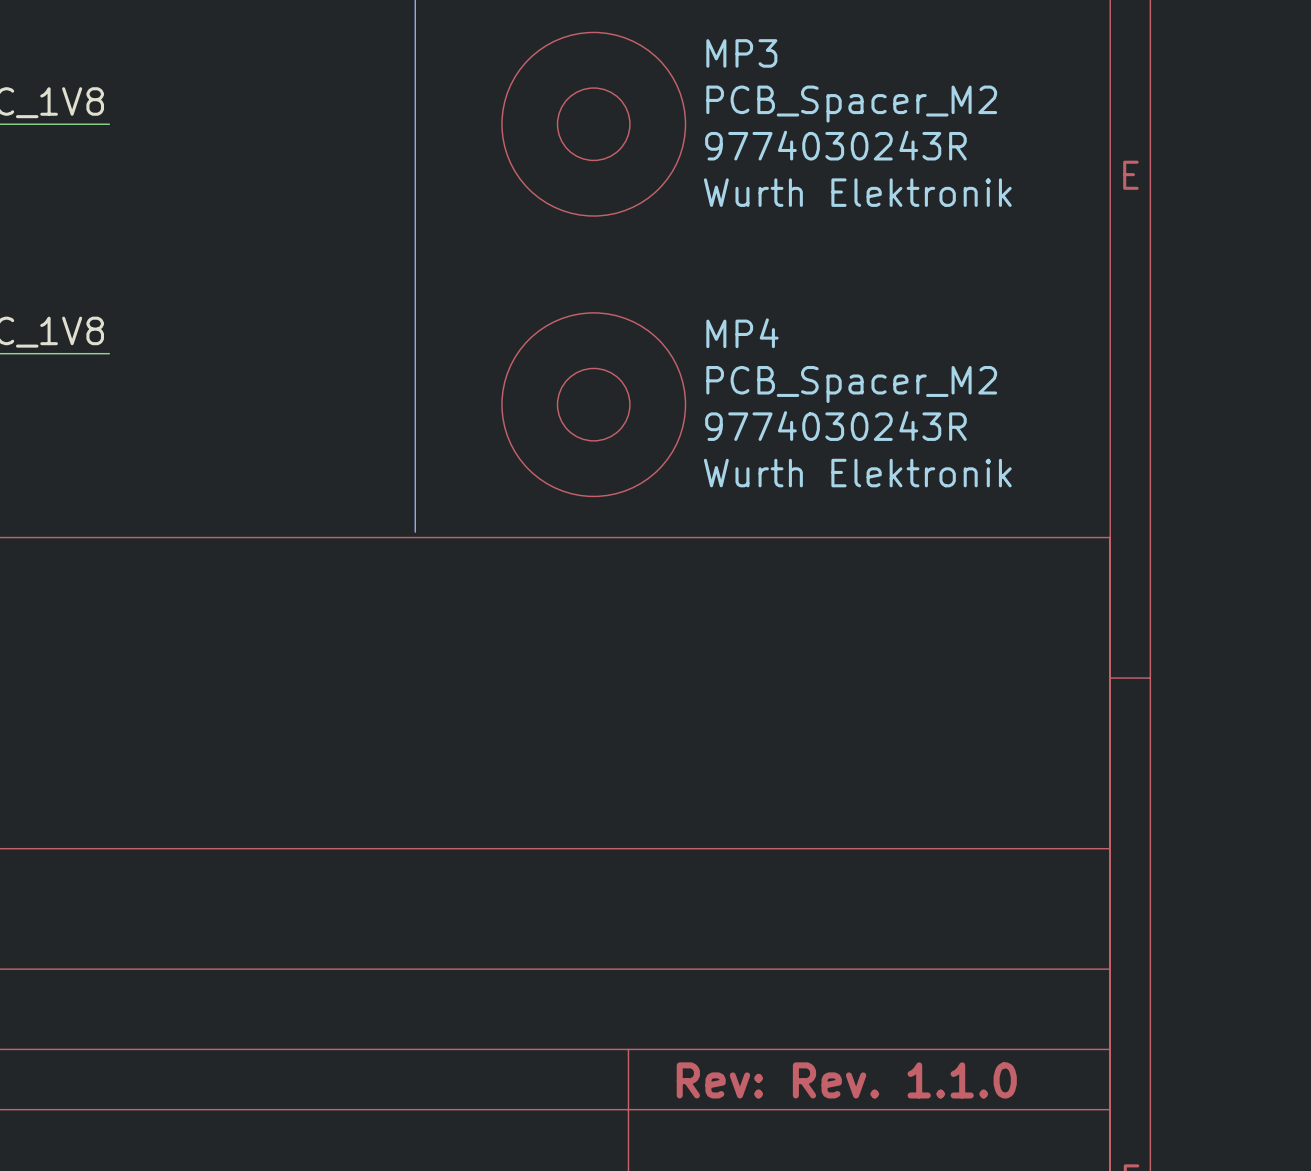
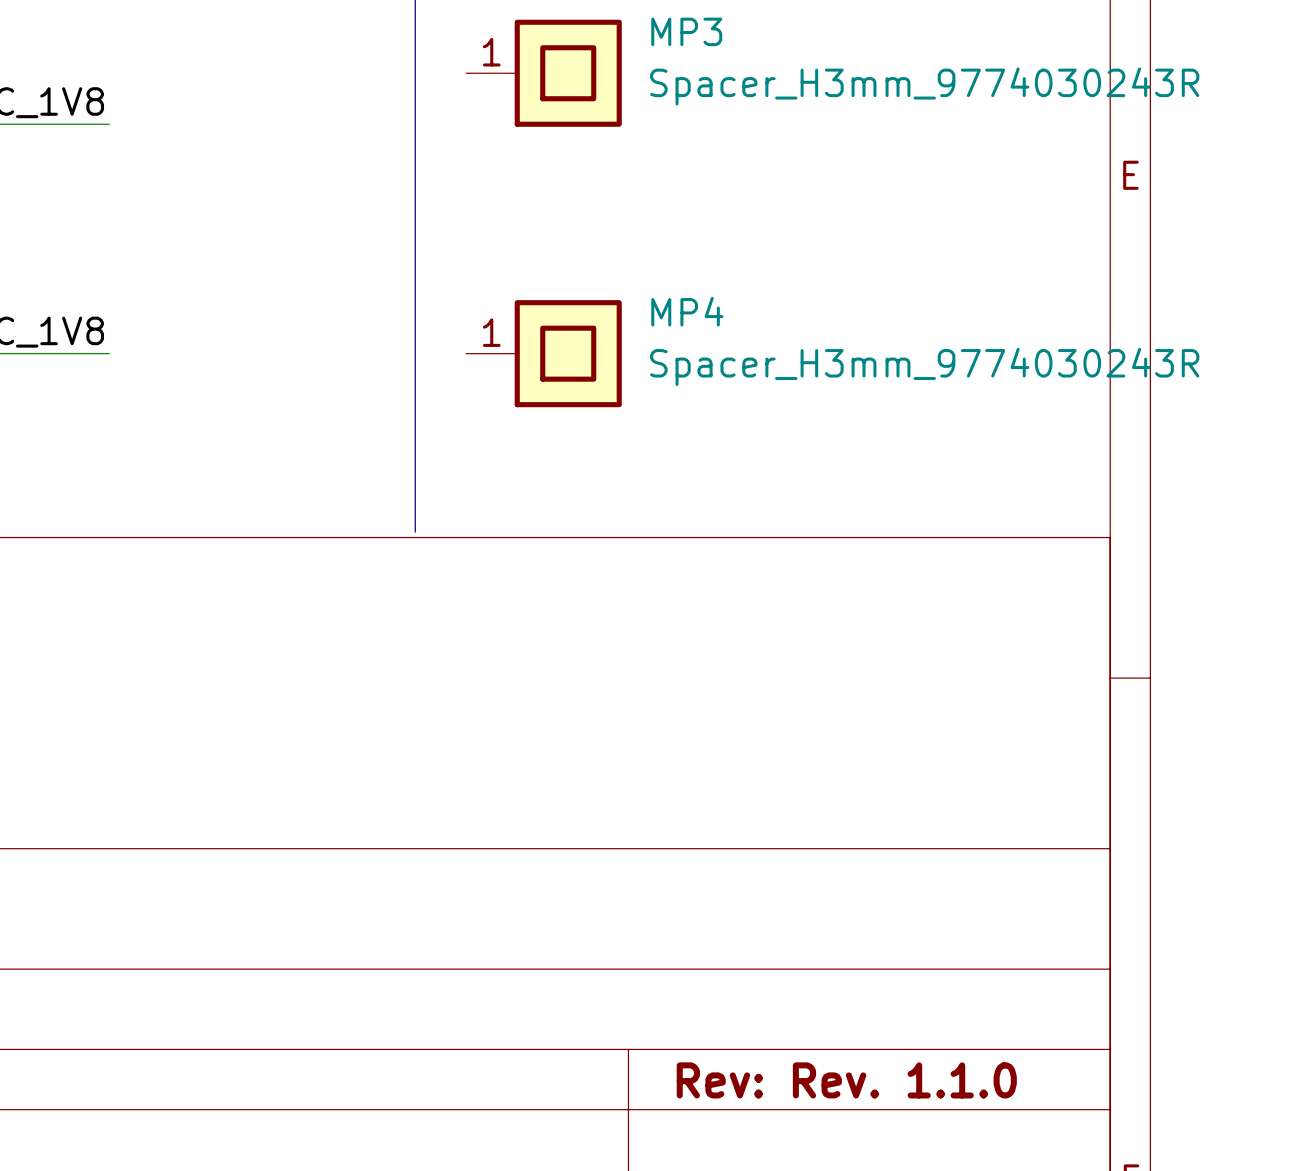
MP3 symbol: [501, 32, 686, 217] -> [466, 19, 622, 127]
MP3 value: PCB_Spacer_M2 (851, 104) -> Spacer_H3mm_9774030243R (924, 86)
MP3 text: 9774030243R (835, 145) -> none
MP3 text: Wurth Elektronik (857, 192) -> none
MP4 symbol: [501, 312, 686, 497] -> [466, 300, 622, 408]
MP4 value: PCB_Spacer_M2 (851, 384) -> Spacer_H3mm_9774030243R (924, 366)
MP4 text: 9774030243R (835, 426) -> none
MP4 text: Wurth Elektronik (857, 473) -> none

